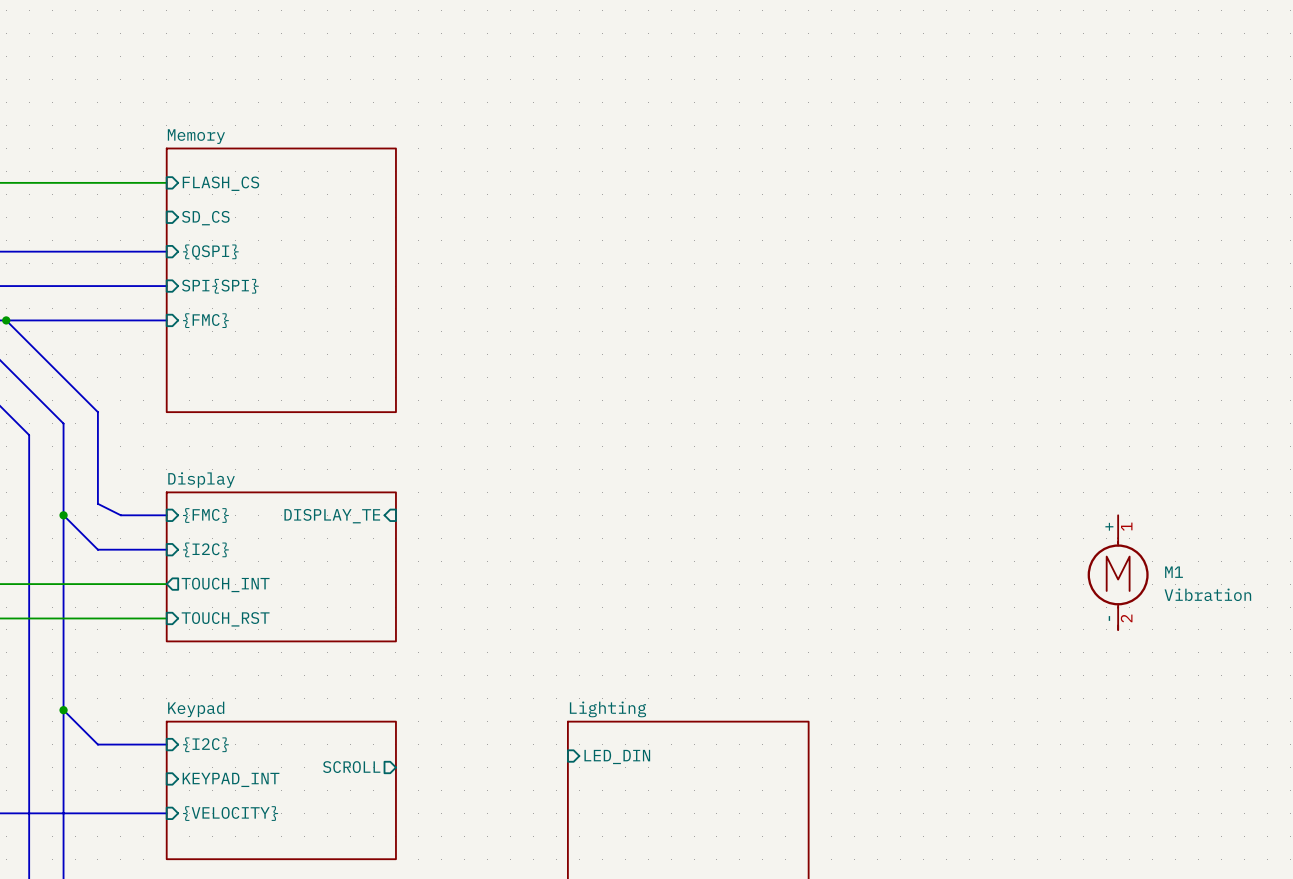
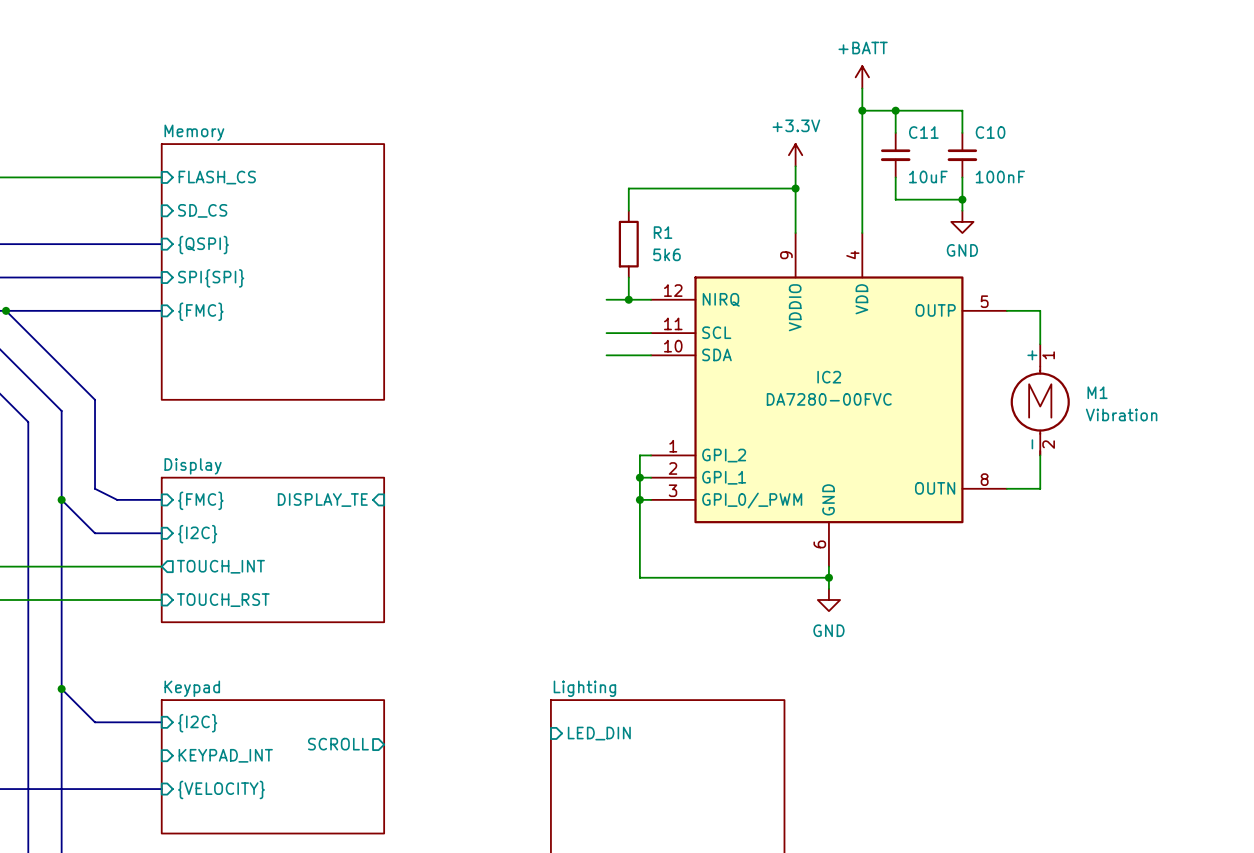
power symbol: none -> +BATT (862, 77)
wire: none -> (862, 88) (862, 233)
wire: none -> (862, 110) (962, 110) (962, 132)
junction: none -> (862, 110)
wire: none -> (895, 110) (895, 132)
junction: none -> (895, 110)
power symbol: none -> +3.3V (795, 155)
C11: none -> 10uF (895, 155)
C10: none -> 100nF (962, 155)
wire: none -> (795, 166) (795, 233)
wire: none -> (895, 177) (895, 199) (962, 199)
wire: none -> (962, 177) (962, 210)
wire: none -> (795, 188) (628, 188) (628, 210)
junction: none -> (795, 188)
junction: none -> (962, 199)
power symbol: none -> GND (962, 221)
R1: none -> 5k6 (628, 244)
wire: none -> (628, 277) (628, 299)
wire: none -> (606, 299) (651, 299)
junction: none -> (628, 299)
wire: none -> (1006, 310) (1040, 310) (1040, 344)
wire: none -> (606, 333) (651, 333)
wire: none -> (606, 355) (651, 355)
IC2: none -> DA7280-00FVC (828, 399)
wire: none -> (651, 455) (639, 455) (639, 577) (828, 577)
wire: none -> (1040, 455) (1040, 488) (1006, 488)
wire: none -> (639, 477) (651, 477)
junction: none -> (639, 477)
wire: none -> (639, 499) (651, 499)
junction: none -> (639, 499)
M1 position: (1118, 572) -> (1040, 399)
M1 name position: M1 (1174, 572) -> M1 (1097, 392)
wire: none -> (828, 566) (828, 588)
M1 value position: Vibration (1207, 594) -> Vibration (1121, 414)
junction: none -> (828, 577)
power symbol: none -> GND (828, 599)

